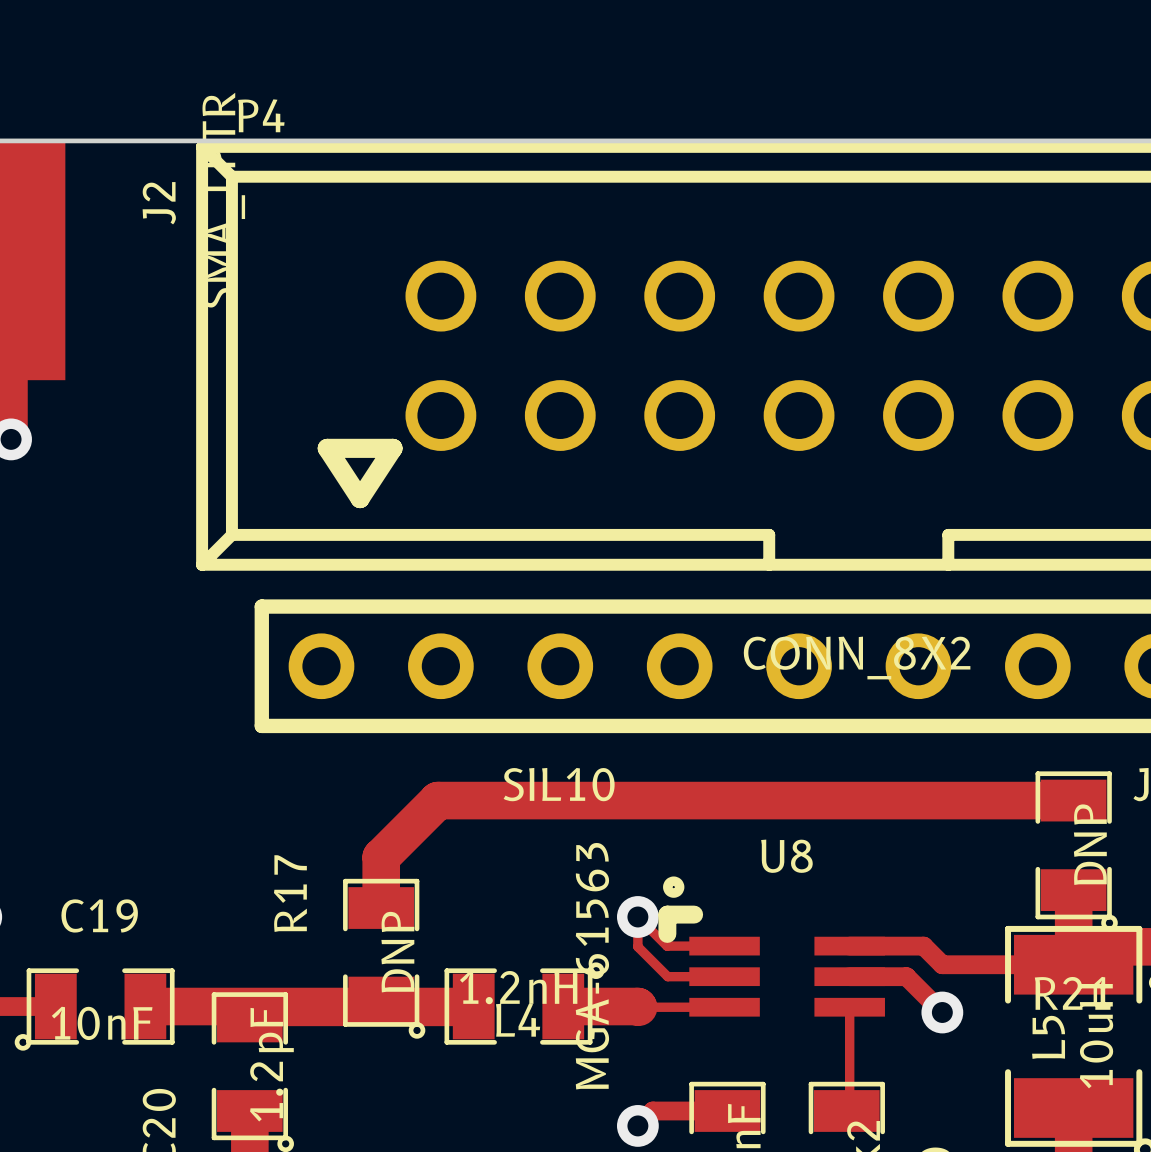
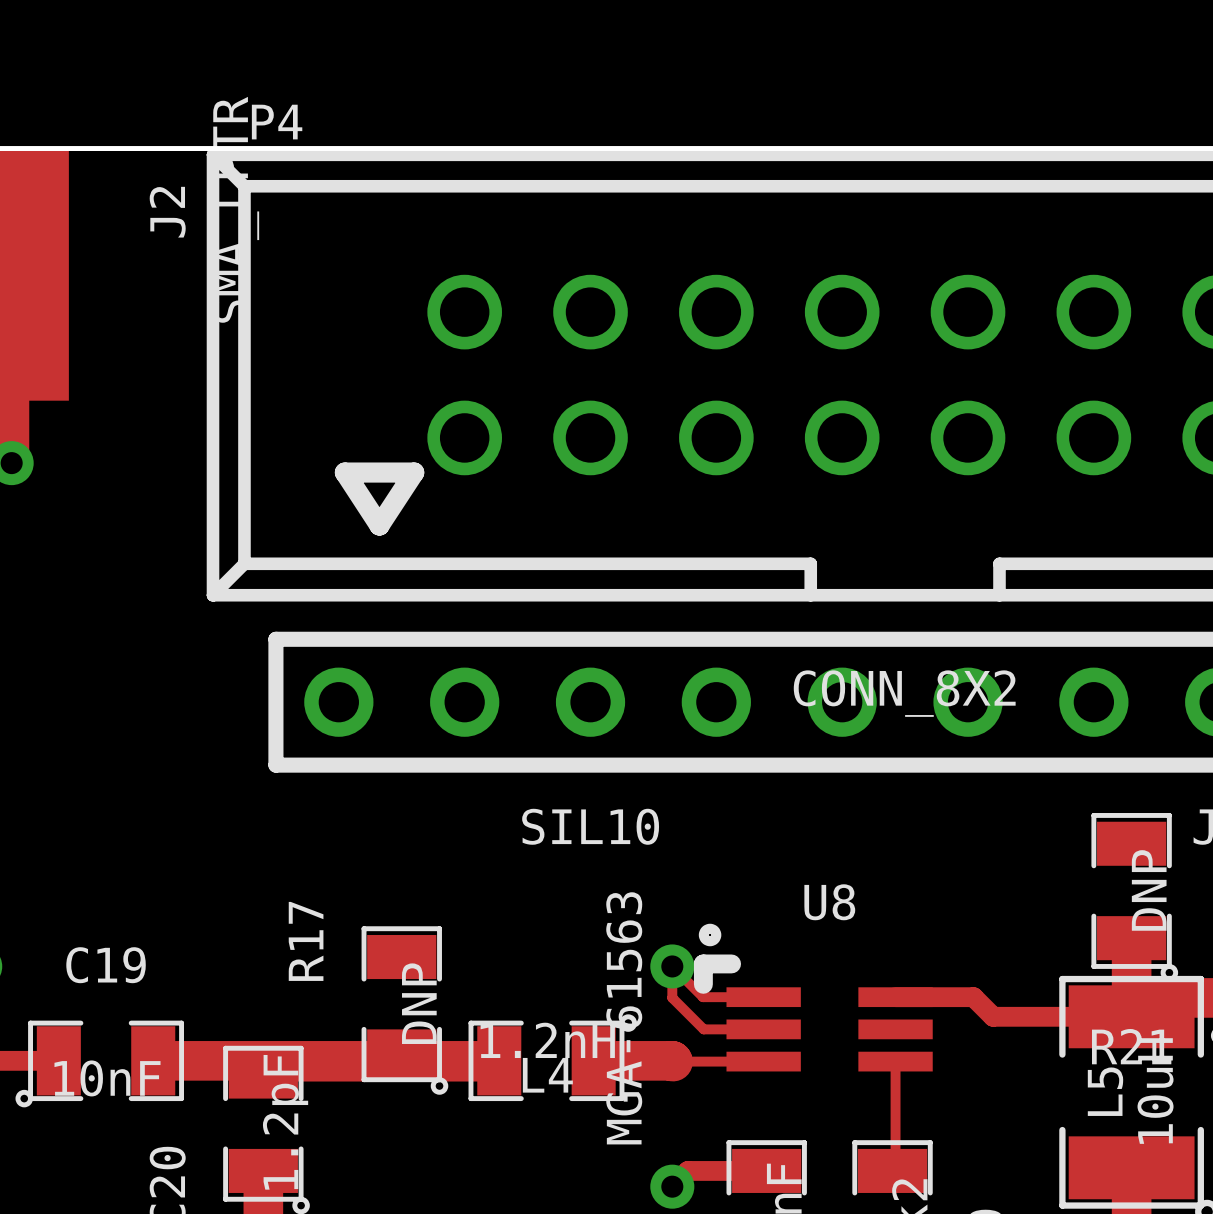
track: (1073, 800) (437, 800) (381, 857) (381, 908) -> none
track: (849, 976) (906, 976) (942, 1012) -> none
via: (942, 1012) -> none

